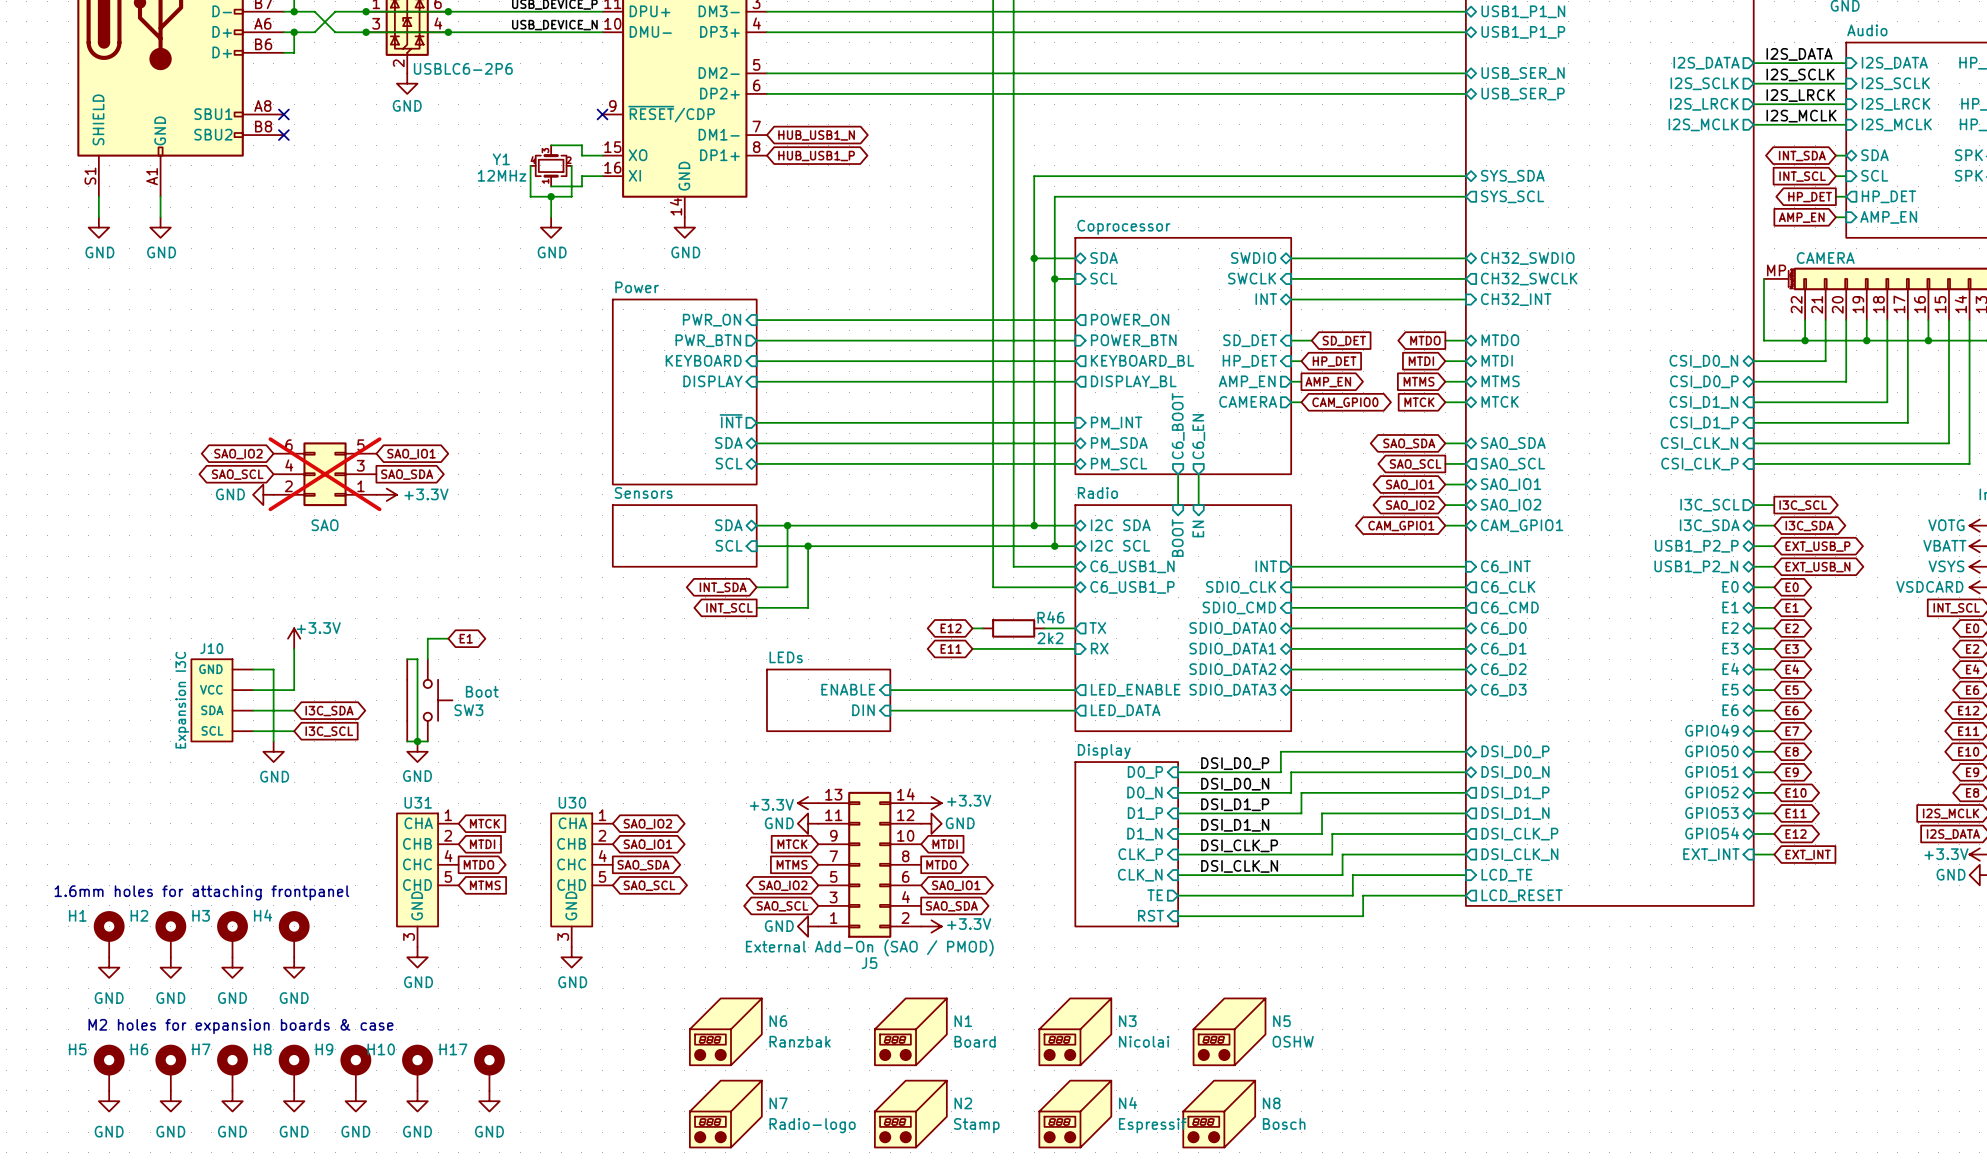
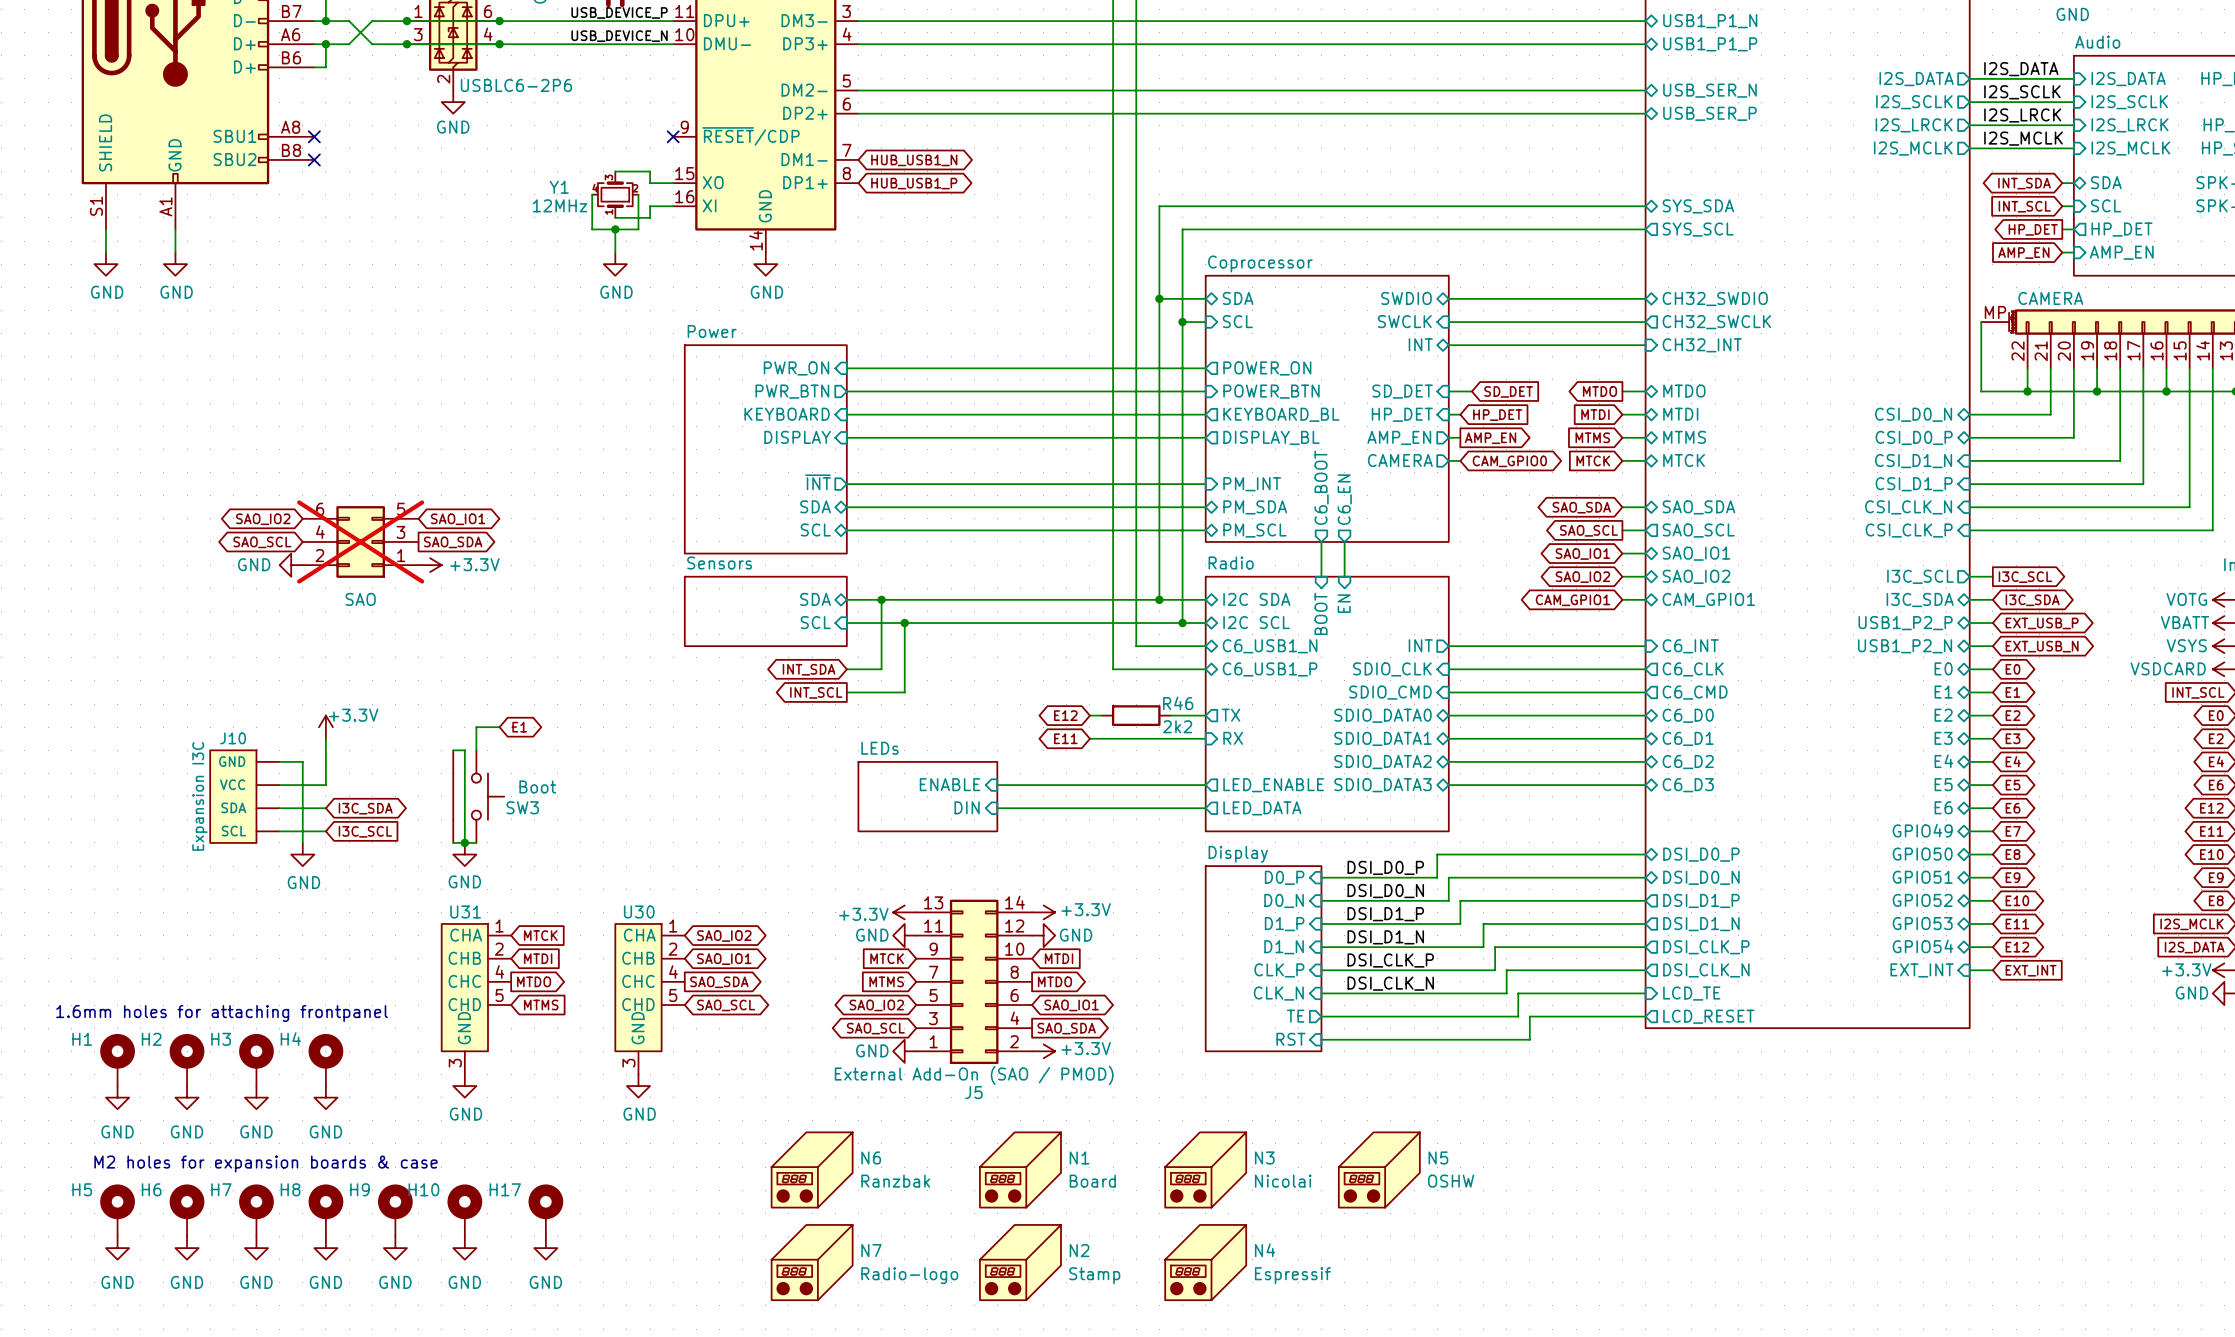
N8: Bosch (1219, 1114) -> none

